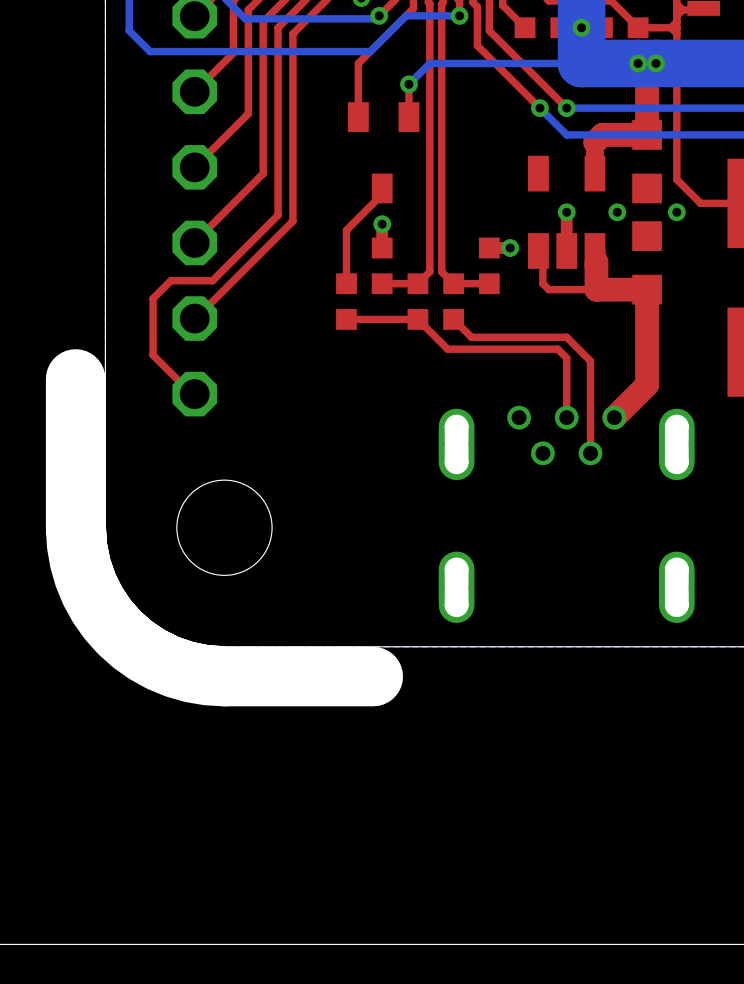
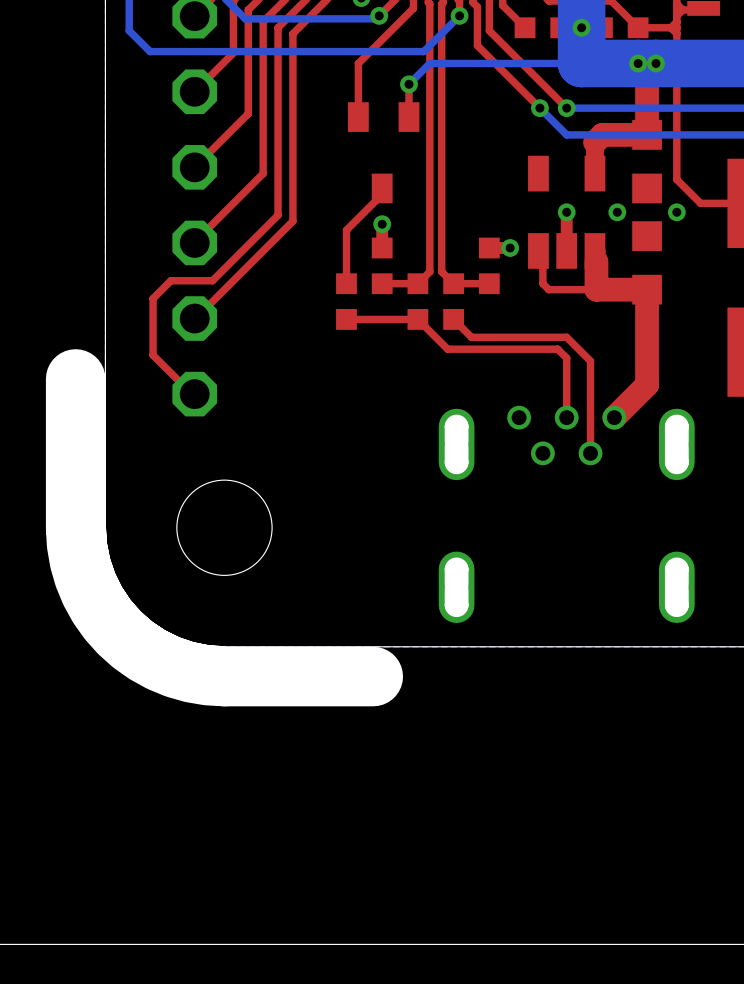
bottom track: (459, 15) (406, 15) (370, 51) -> (459, 15) (423, 51) (370, 51)

